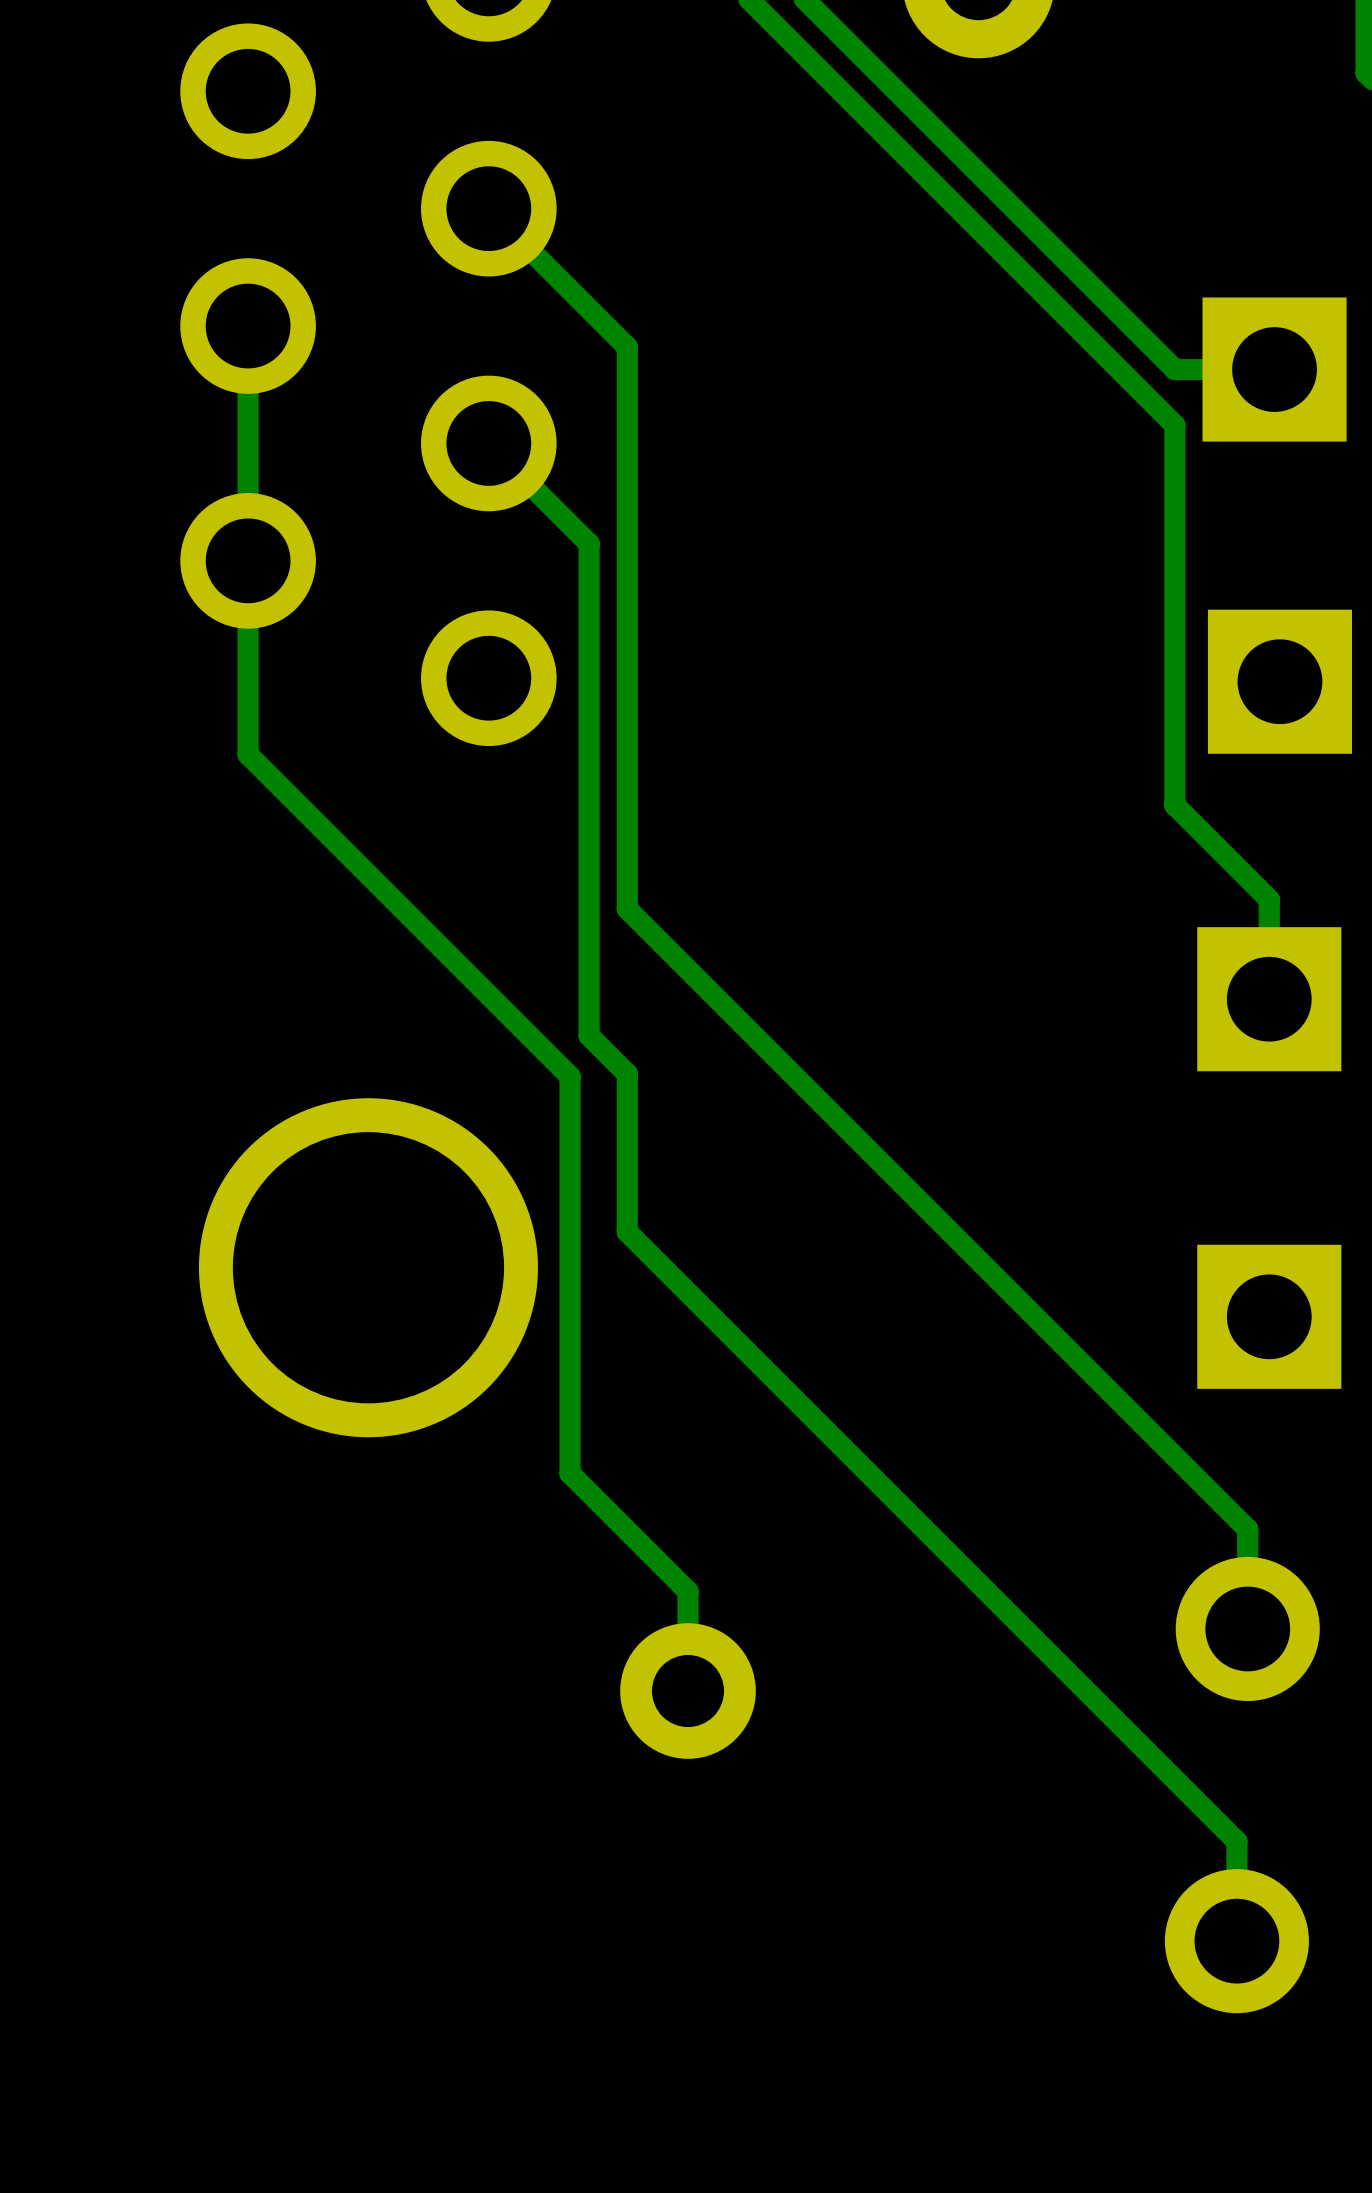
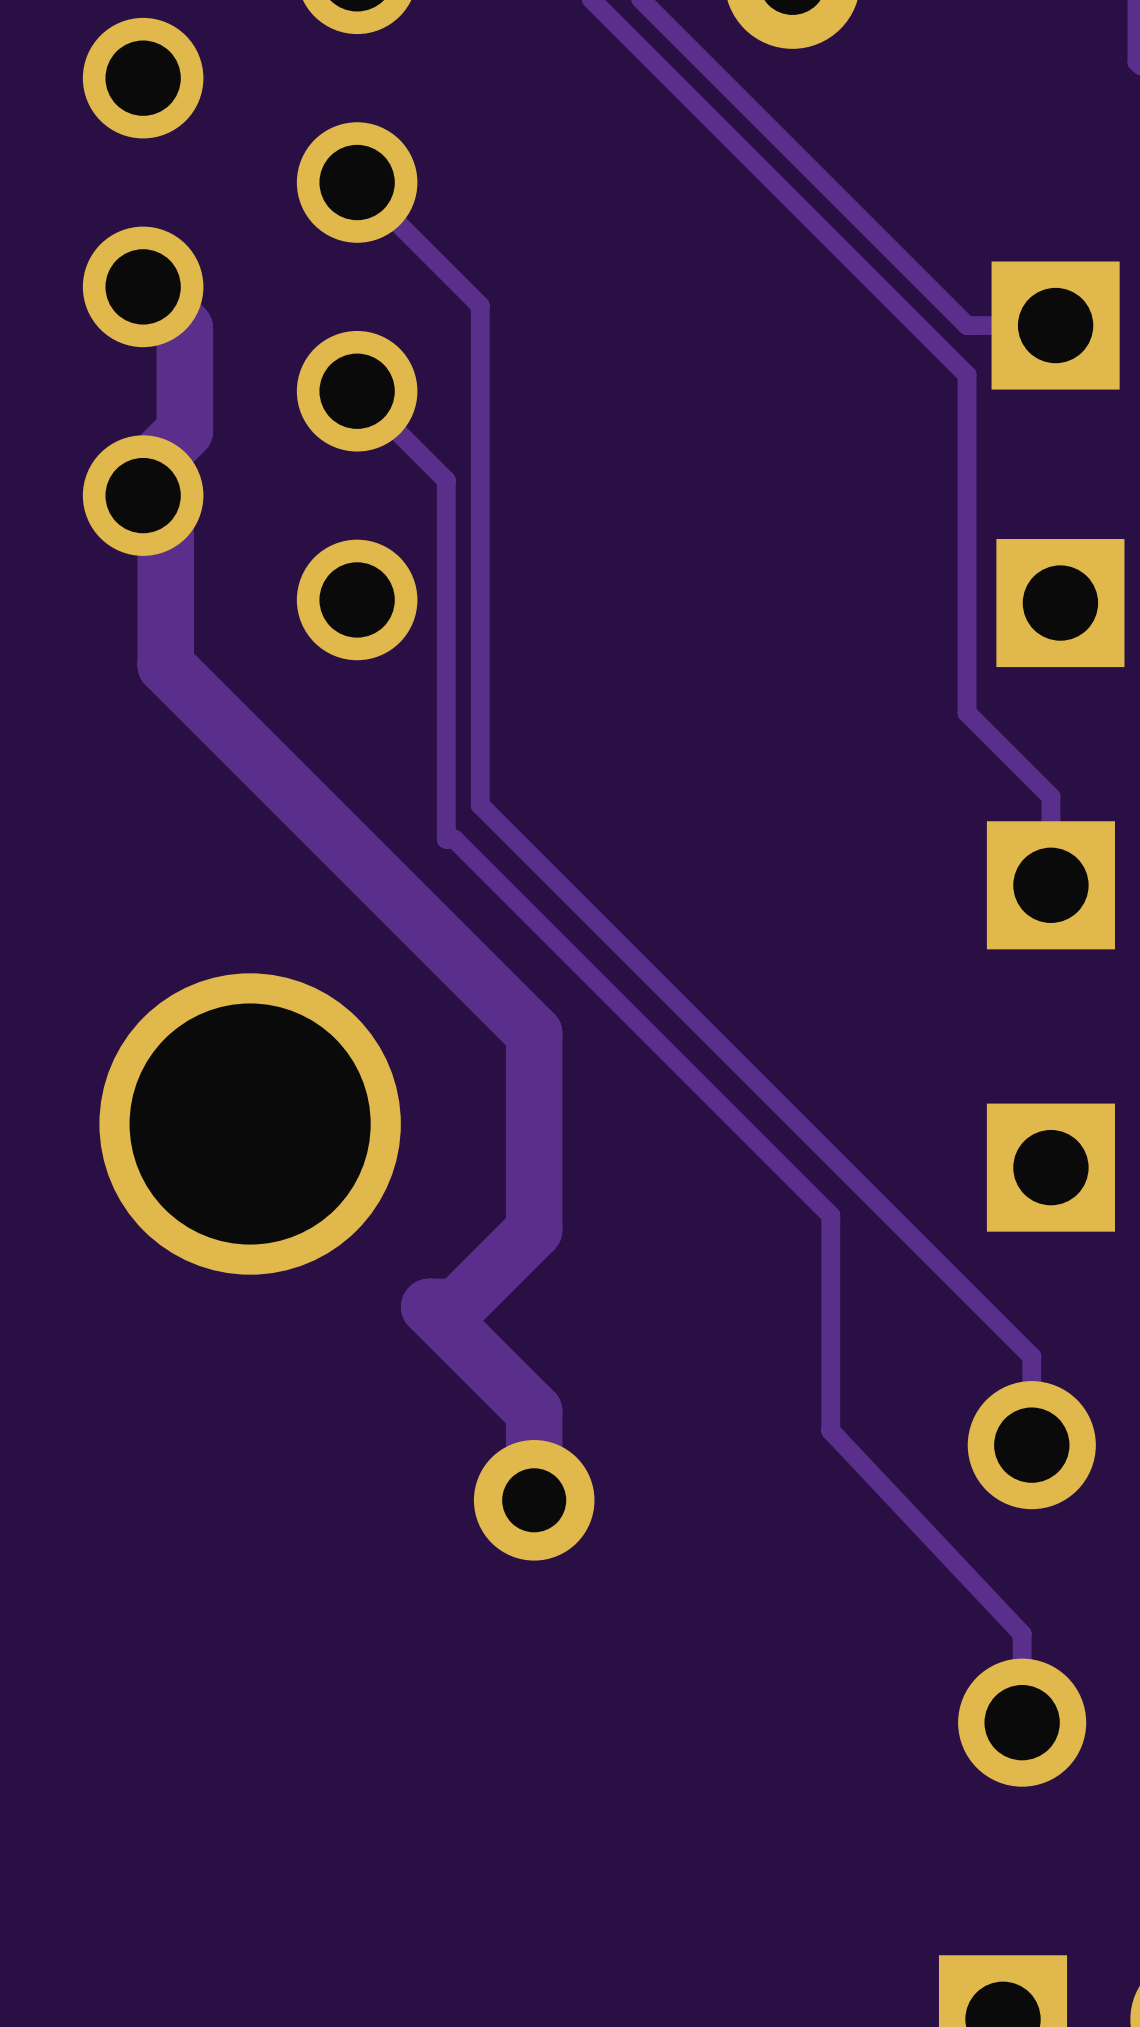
track: (248, 326) (248, 534) -> (143, 286) (184, 328) (184, 430) (143, 472)
track: (248, 560) (248, 754) (570, 1076) (570, 1473) -> (143, 495) (165, 518) (165, 665) (534, 1033) (534, 1229) (457, 1306) (429, 1306)
track: (589, 947) (589, 1035) (627, 1073) (627, 1231) (1236, 1841) -> (446, 839) (454, 839) (830, 1215) (830, 1430) (1022, 1634)
track width: thin (570, 1473) (688, 1591) (688, 1691) -> thick (429, 1306) (534, 1411) (534, 1500)

